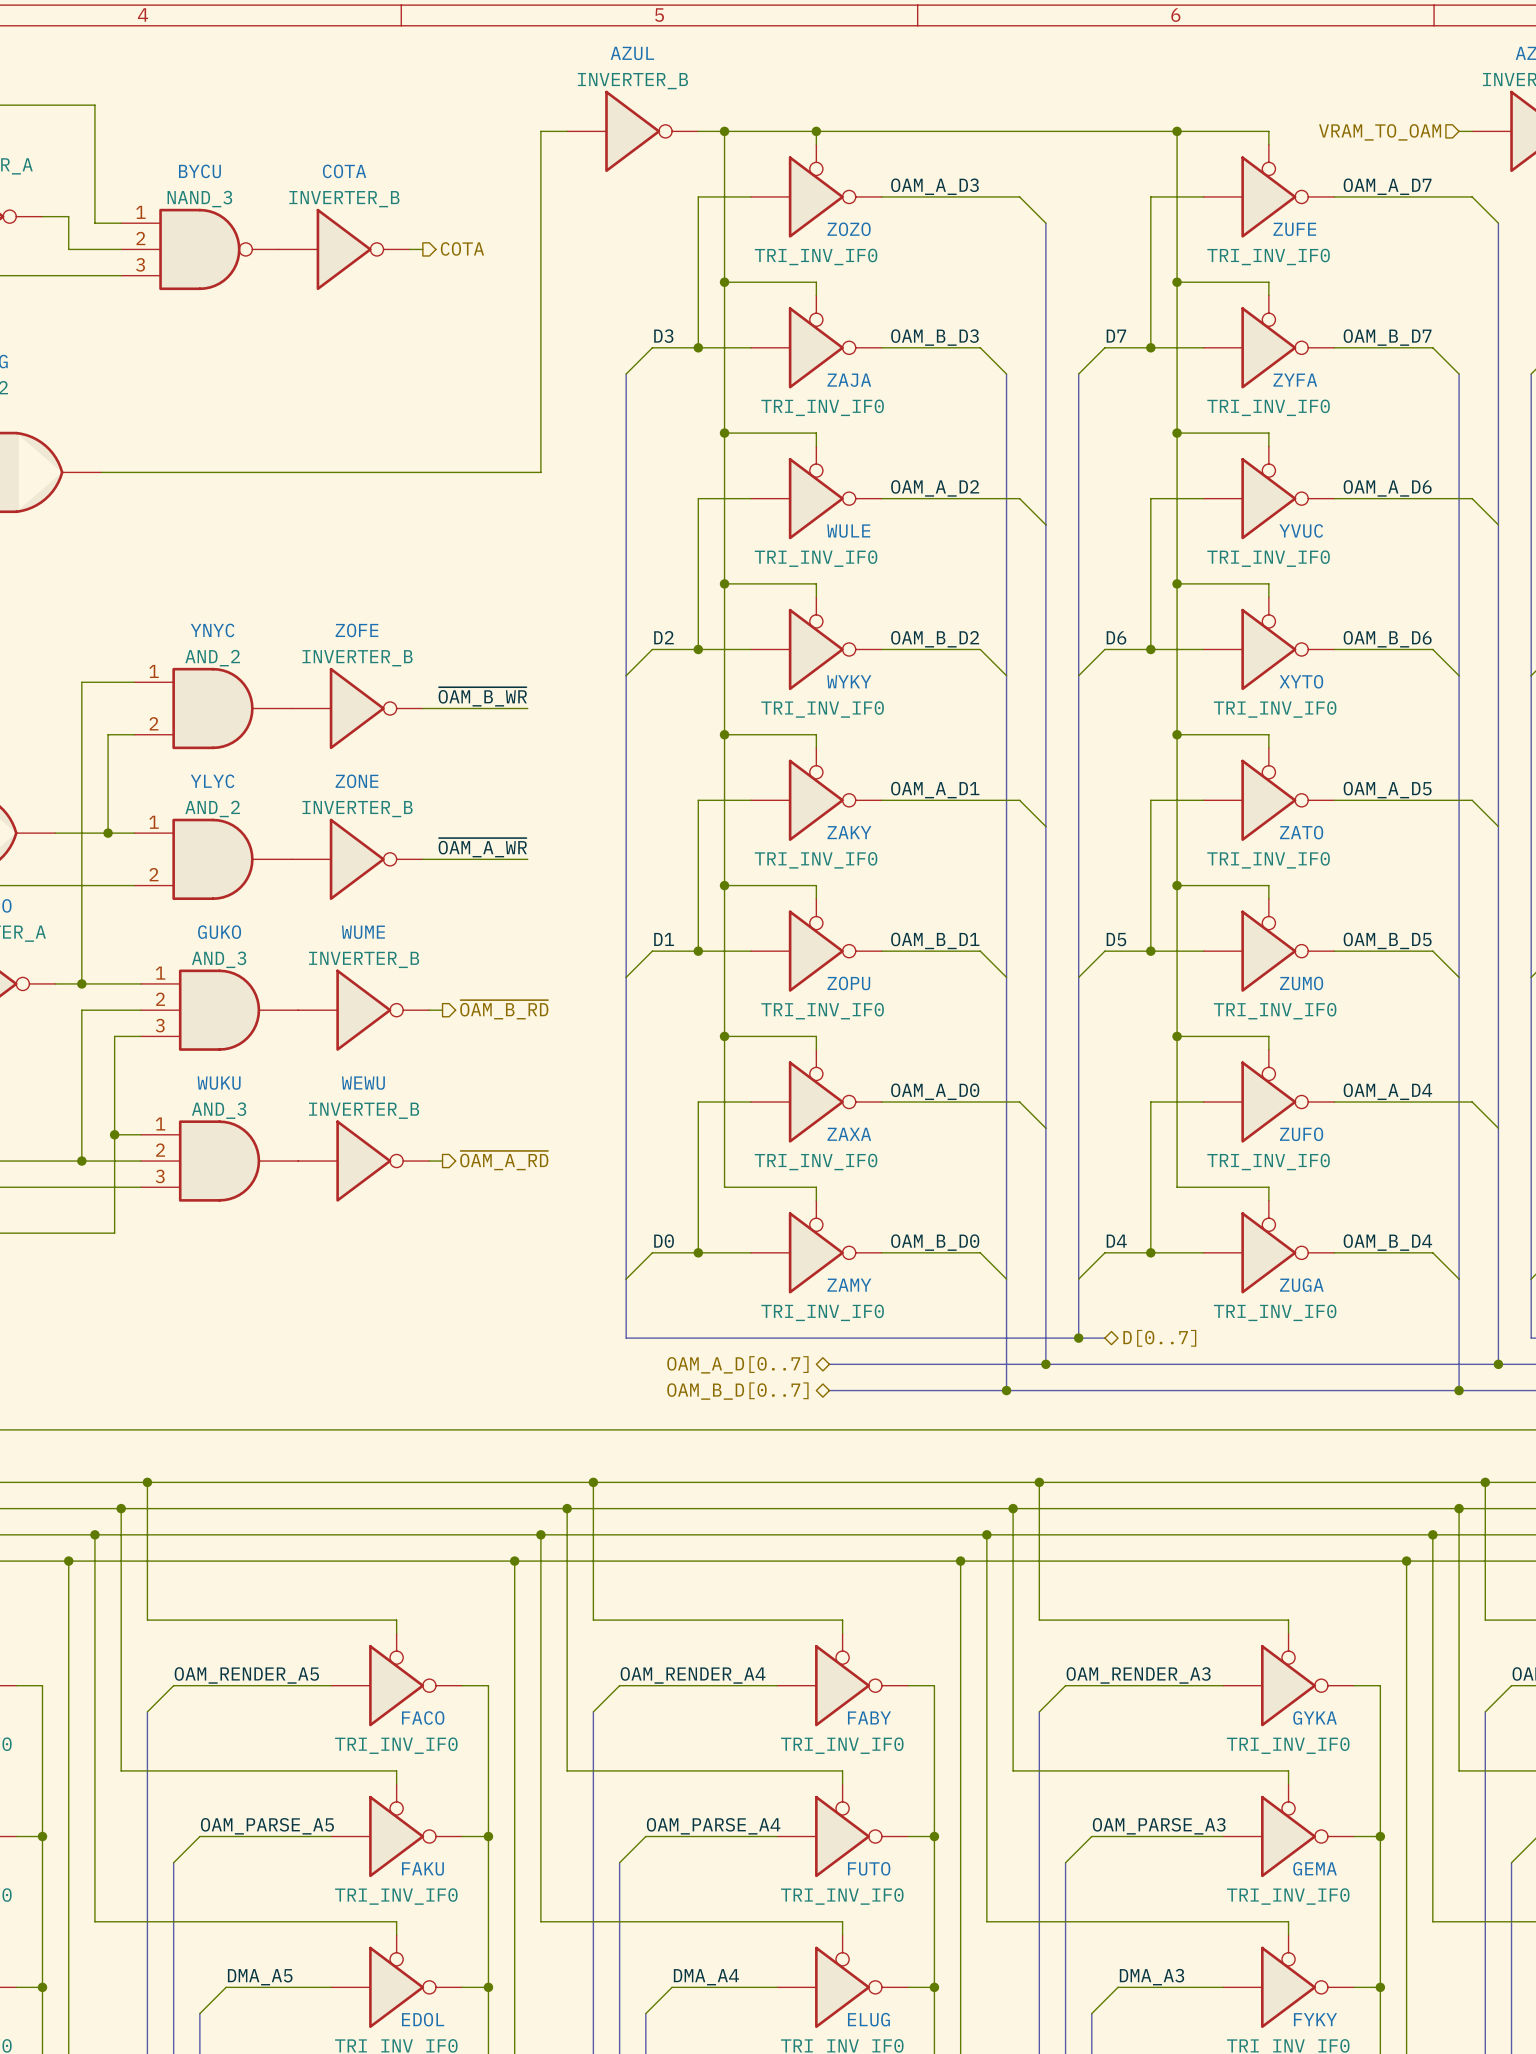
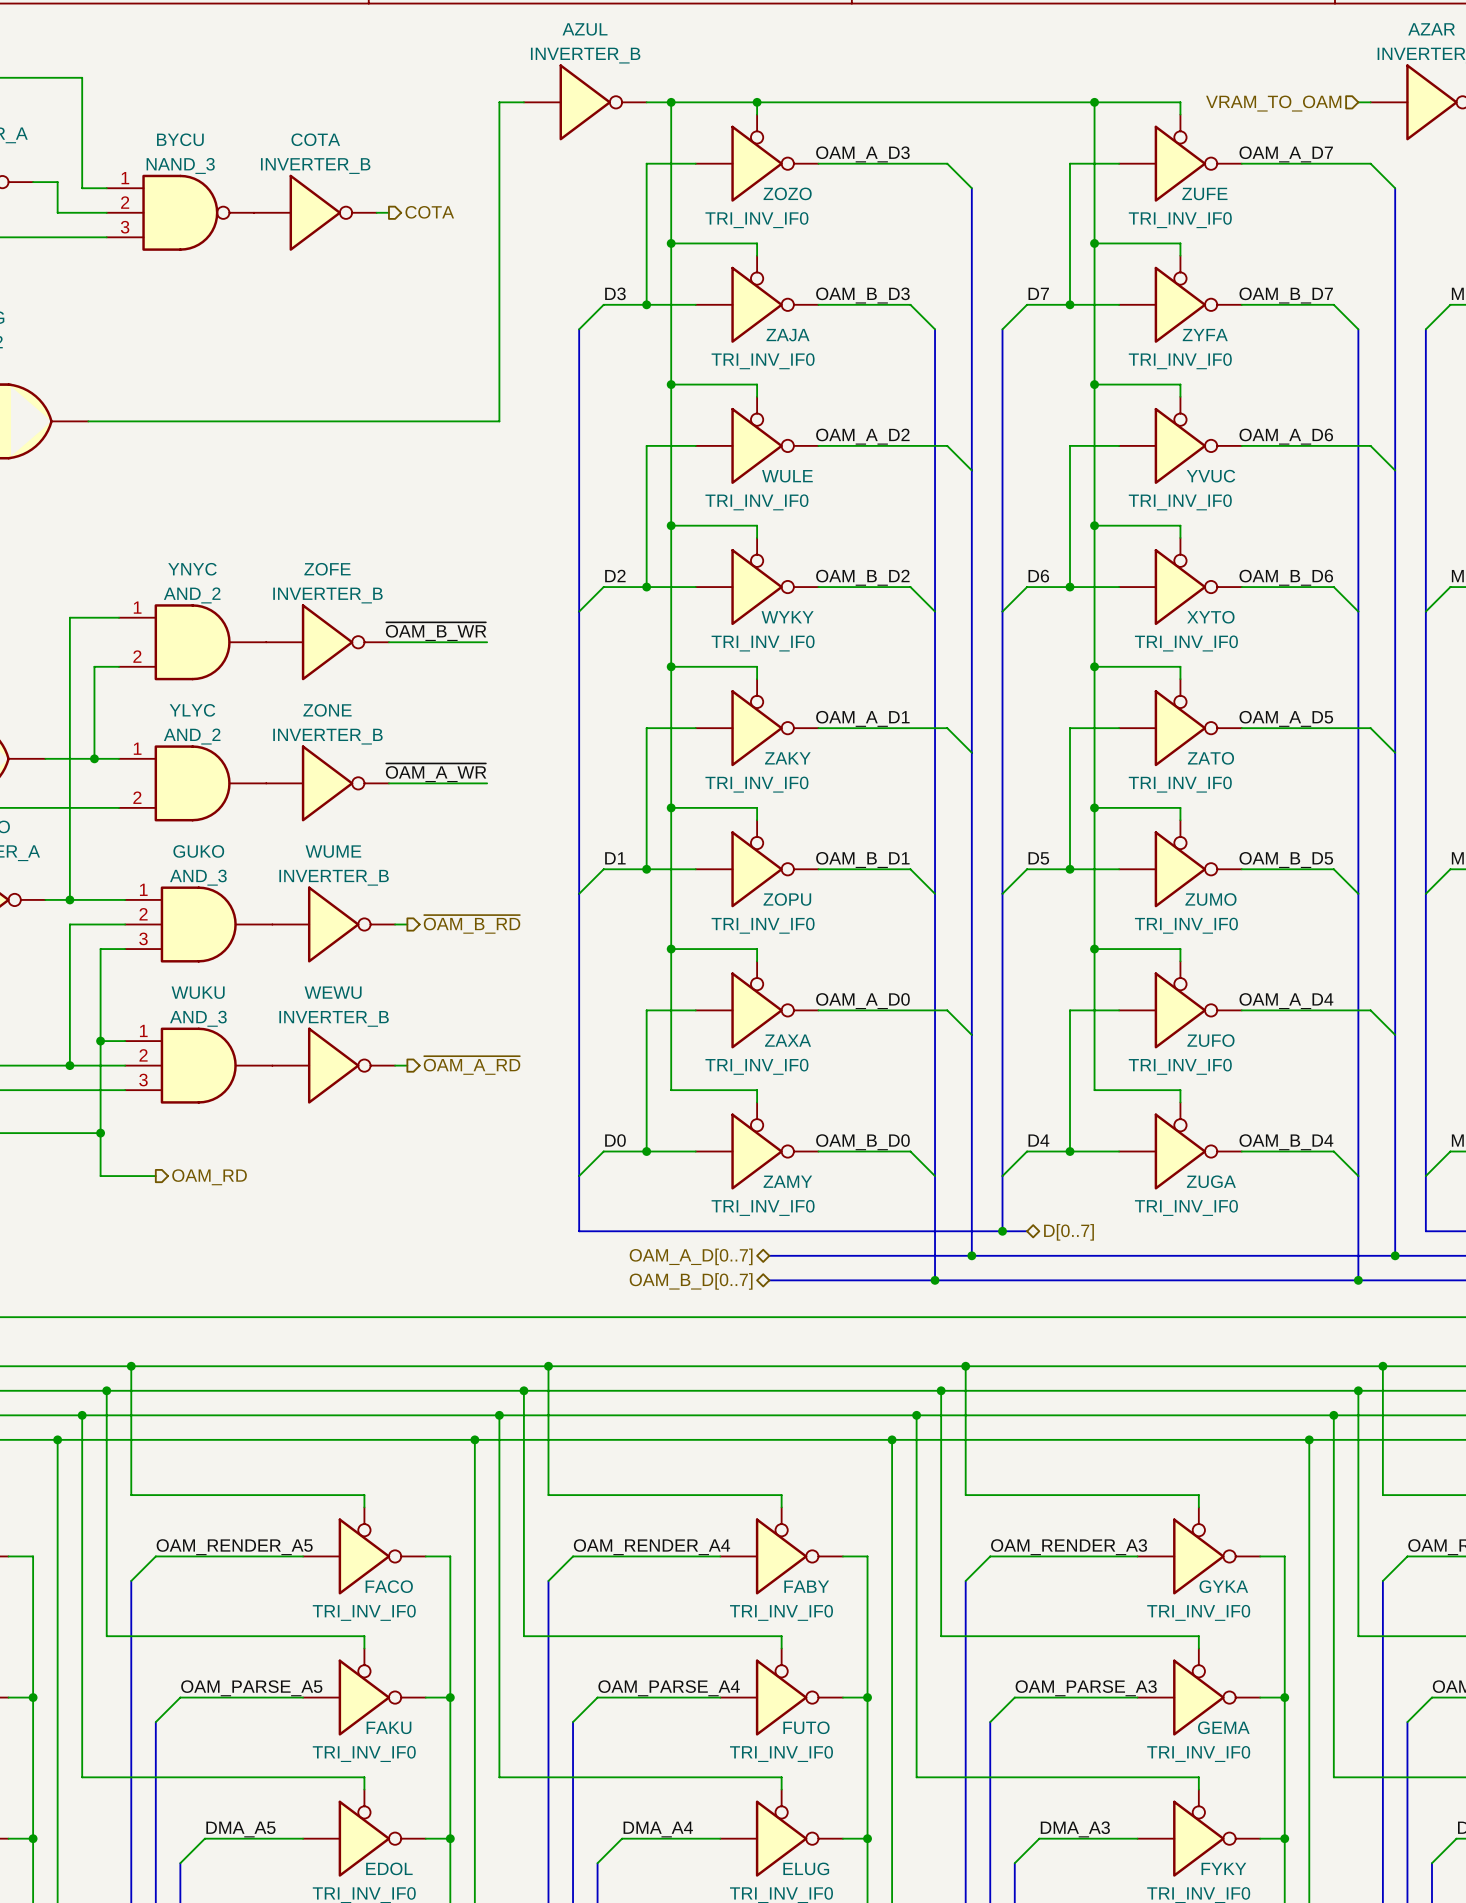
wire: none -> (100, 1133) (100, 1176) (155, 1176)
junction: none -> (100, 1133)
hierarchical label: none -> OAM_RD (209, 1177)

